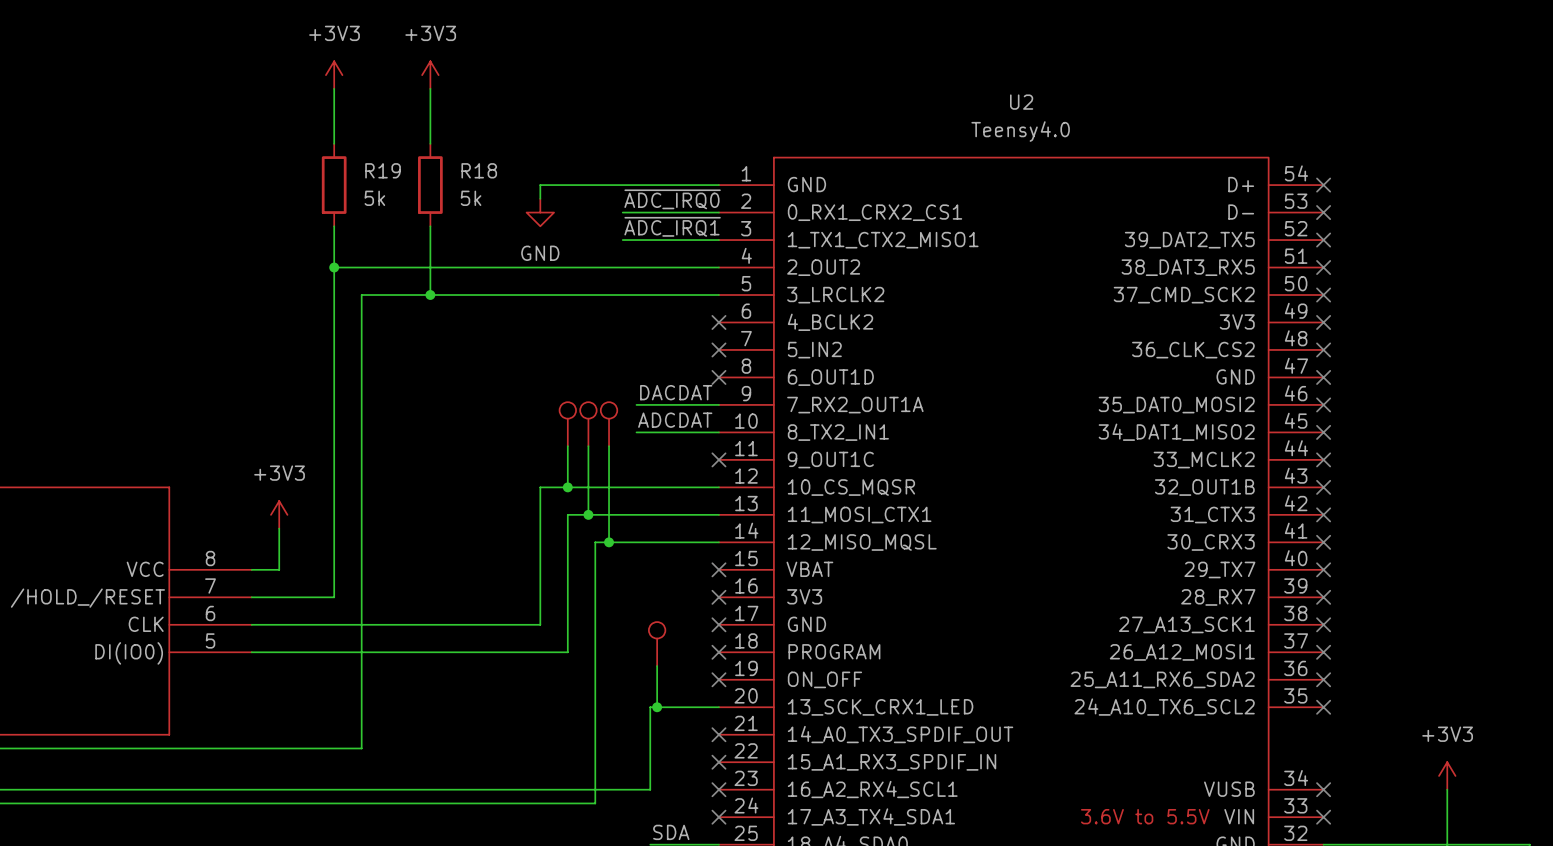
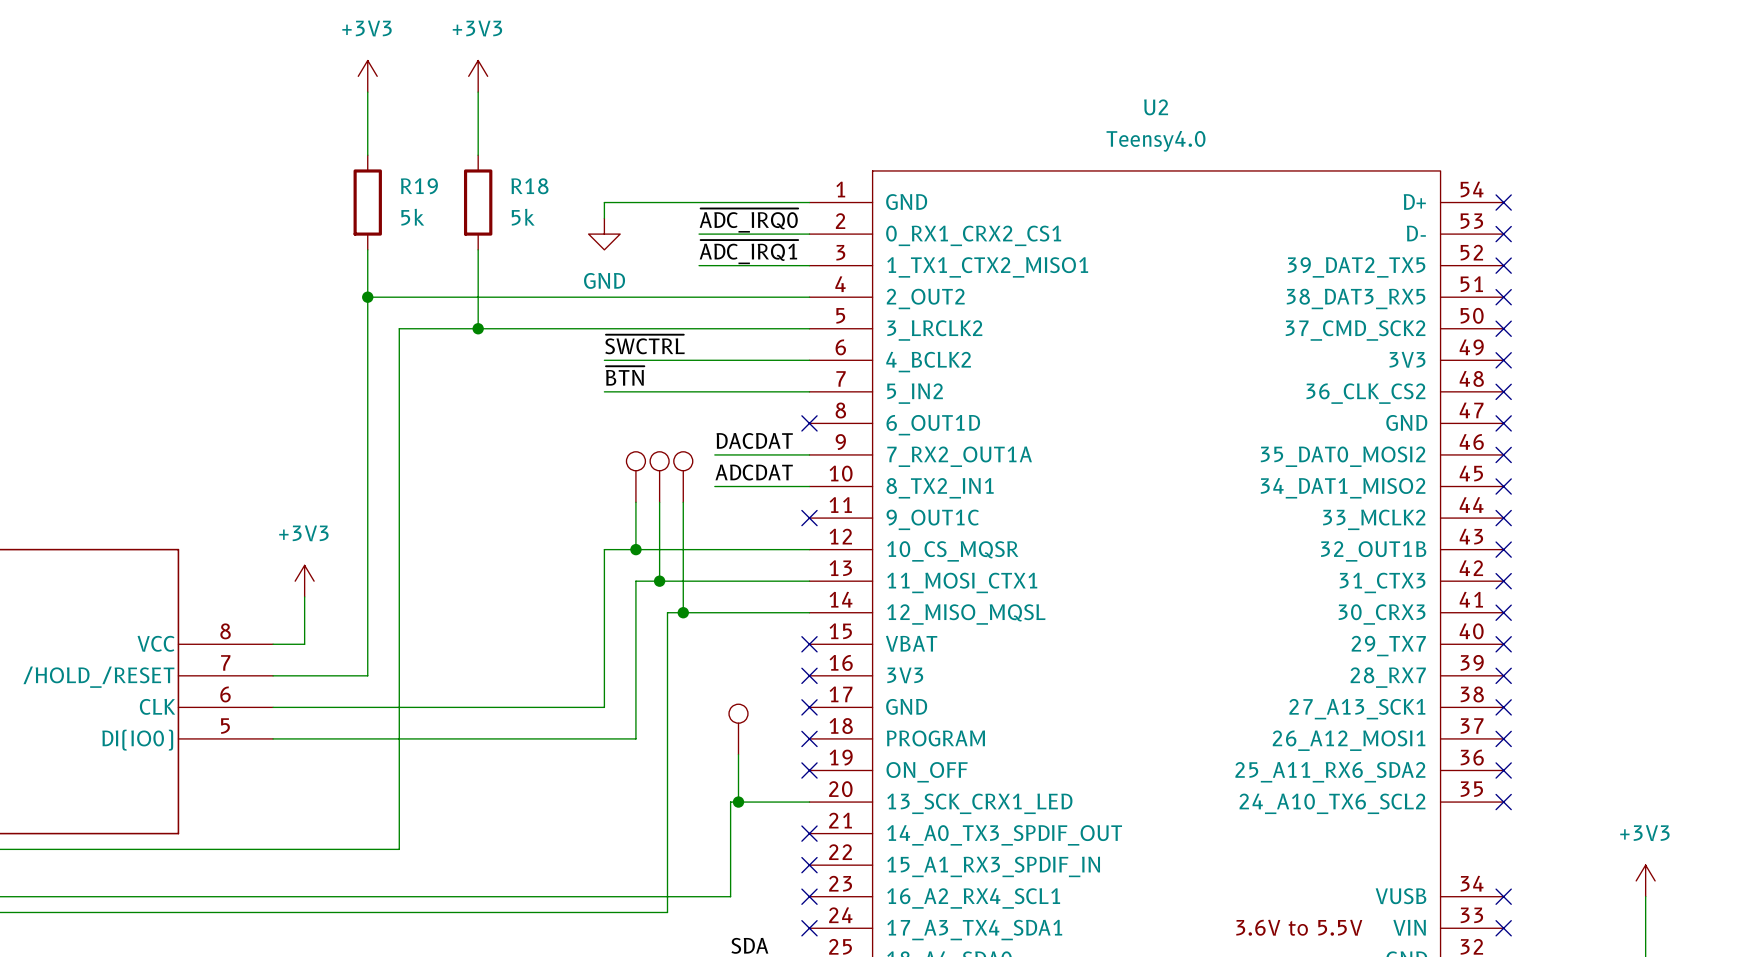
label: none -> ~{SWCTRL} (644, 344)
wire: none -> (604, 360) (809, 360)
no-connect mark: (718, 322) -> none
label: none -> ~{BTN} (625, 375)
wire: none -> (604, 391) (809, 391)
no-connect mark: (718, 349) -> none

